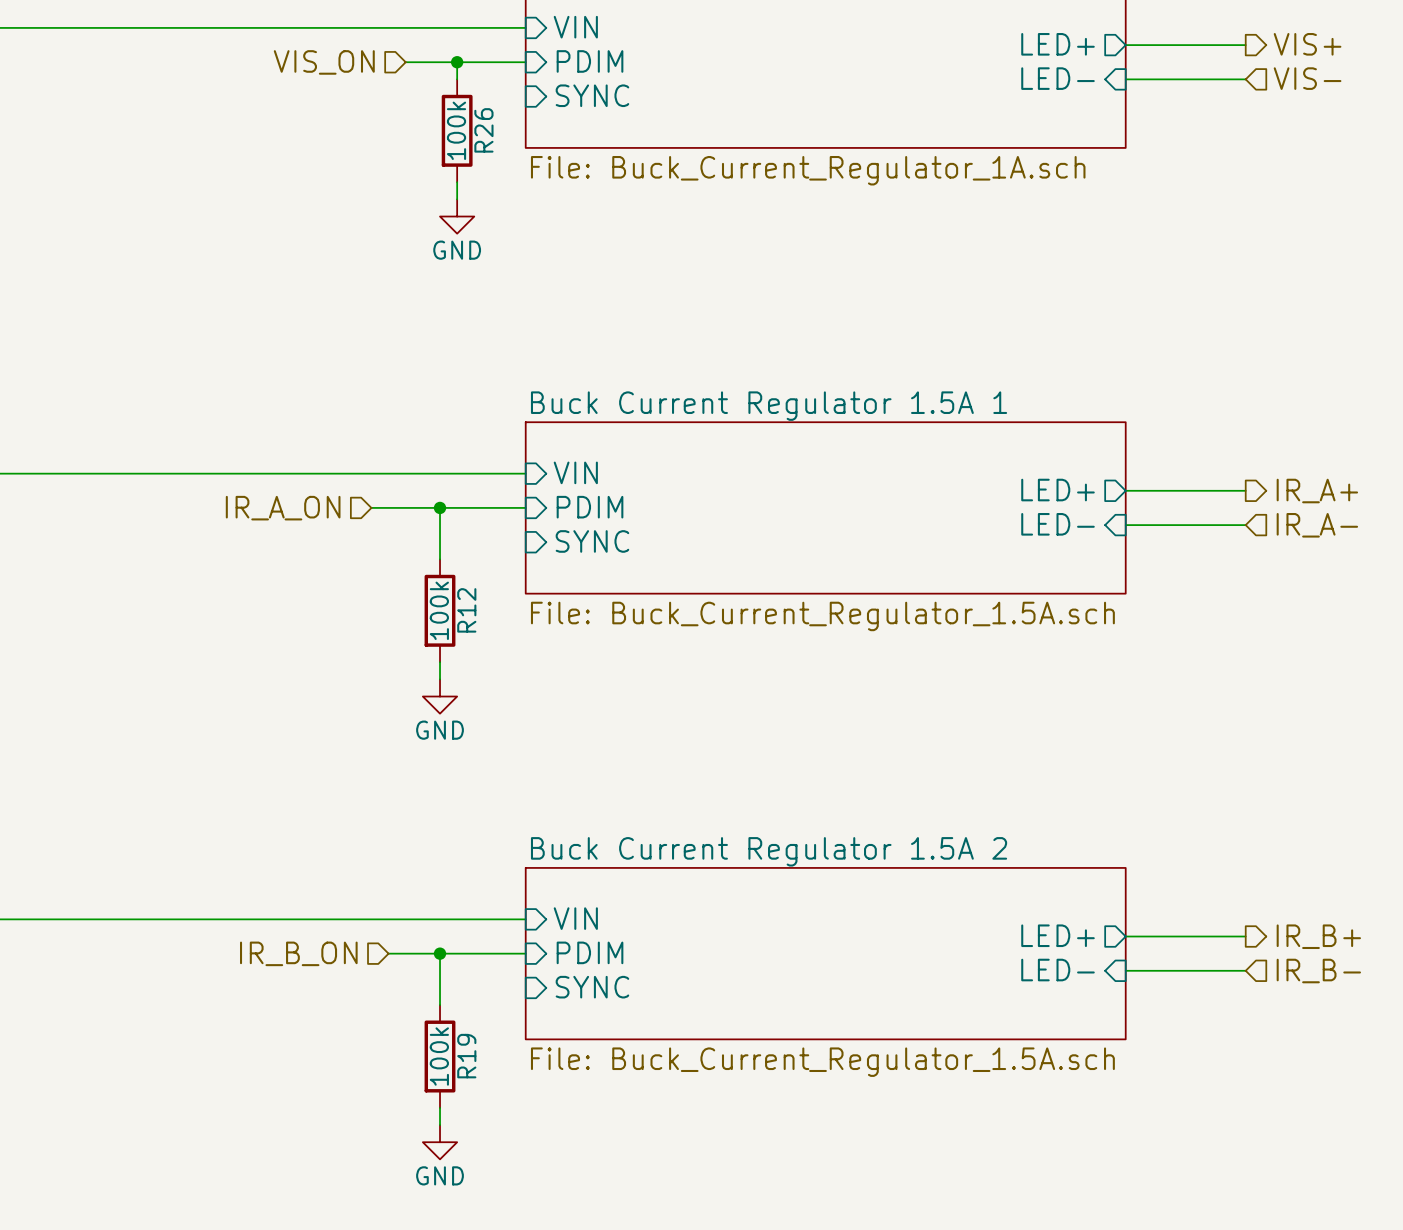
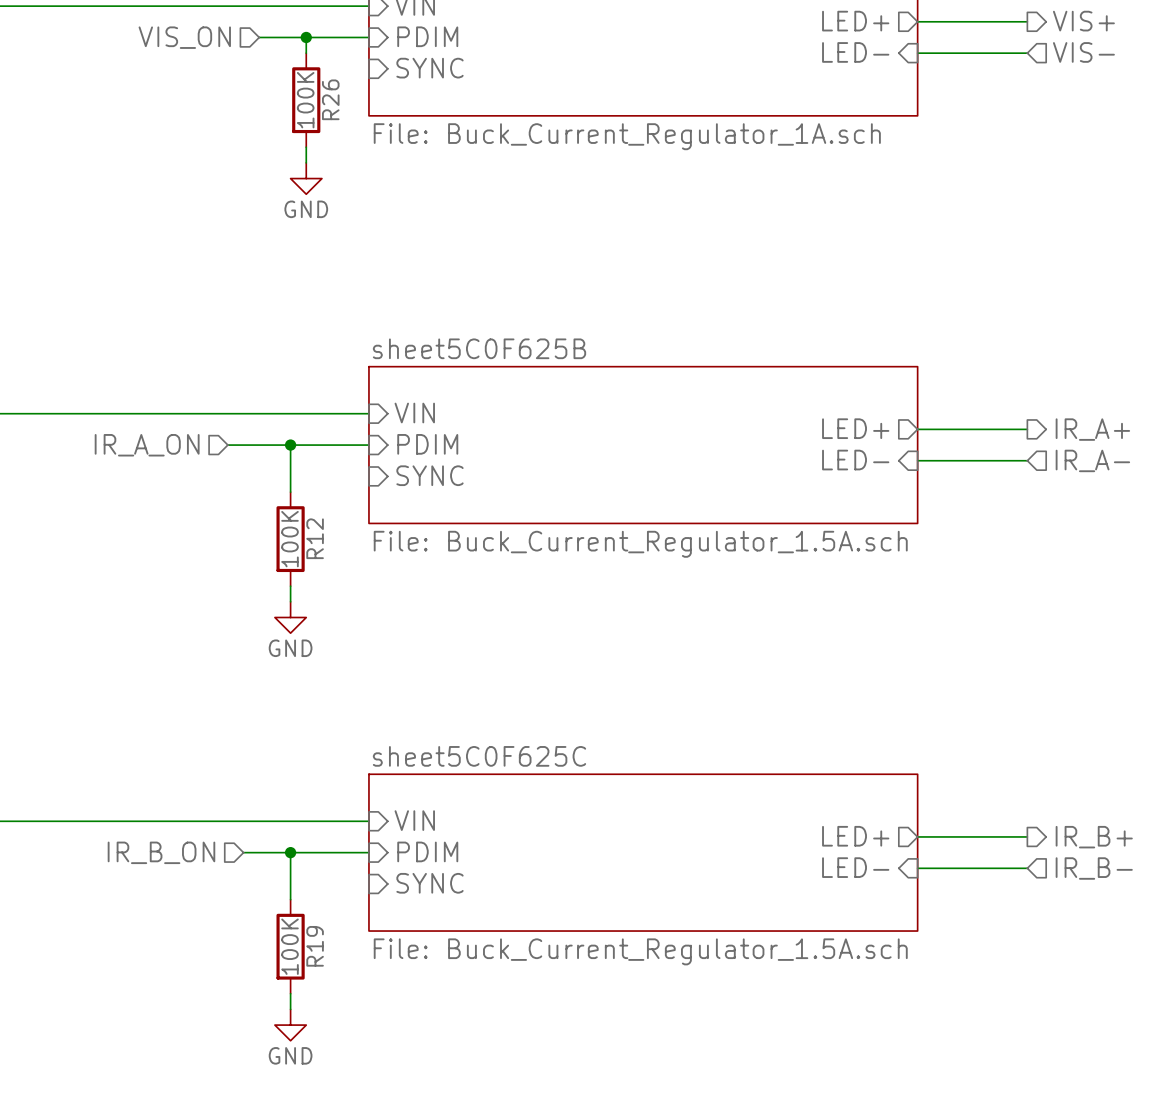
R26 value: 100k (456, 130) -> 100K (305, 100)
sheet Buck Current Regulator 1.5A 1 name: Buck Current Regulator 1.5A 1 (769, 406) -> sheet5C0F625B (479, 348)
R12 value: 100k (439, 610) -> 100K (290, 539)
sheet Buck Current Regulator 1.5A 2 name: Buck Current Regulator 1.5A 2 (769, 851) -> sheet5C0F625C (479, 756)
R19 value: 100k (439, 1056) -> 100K (290, 946)

